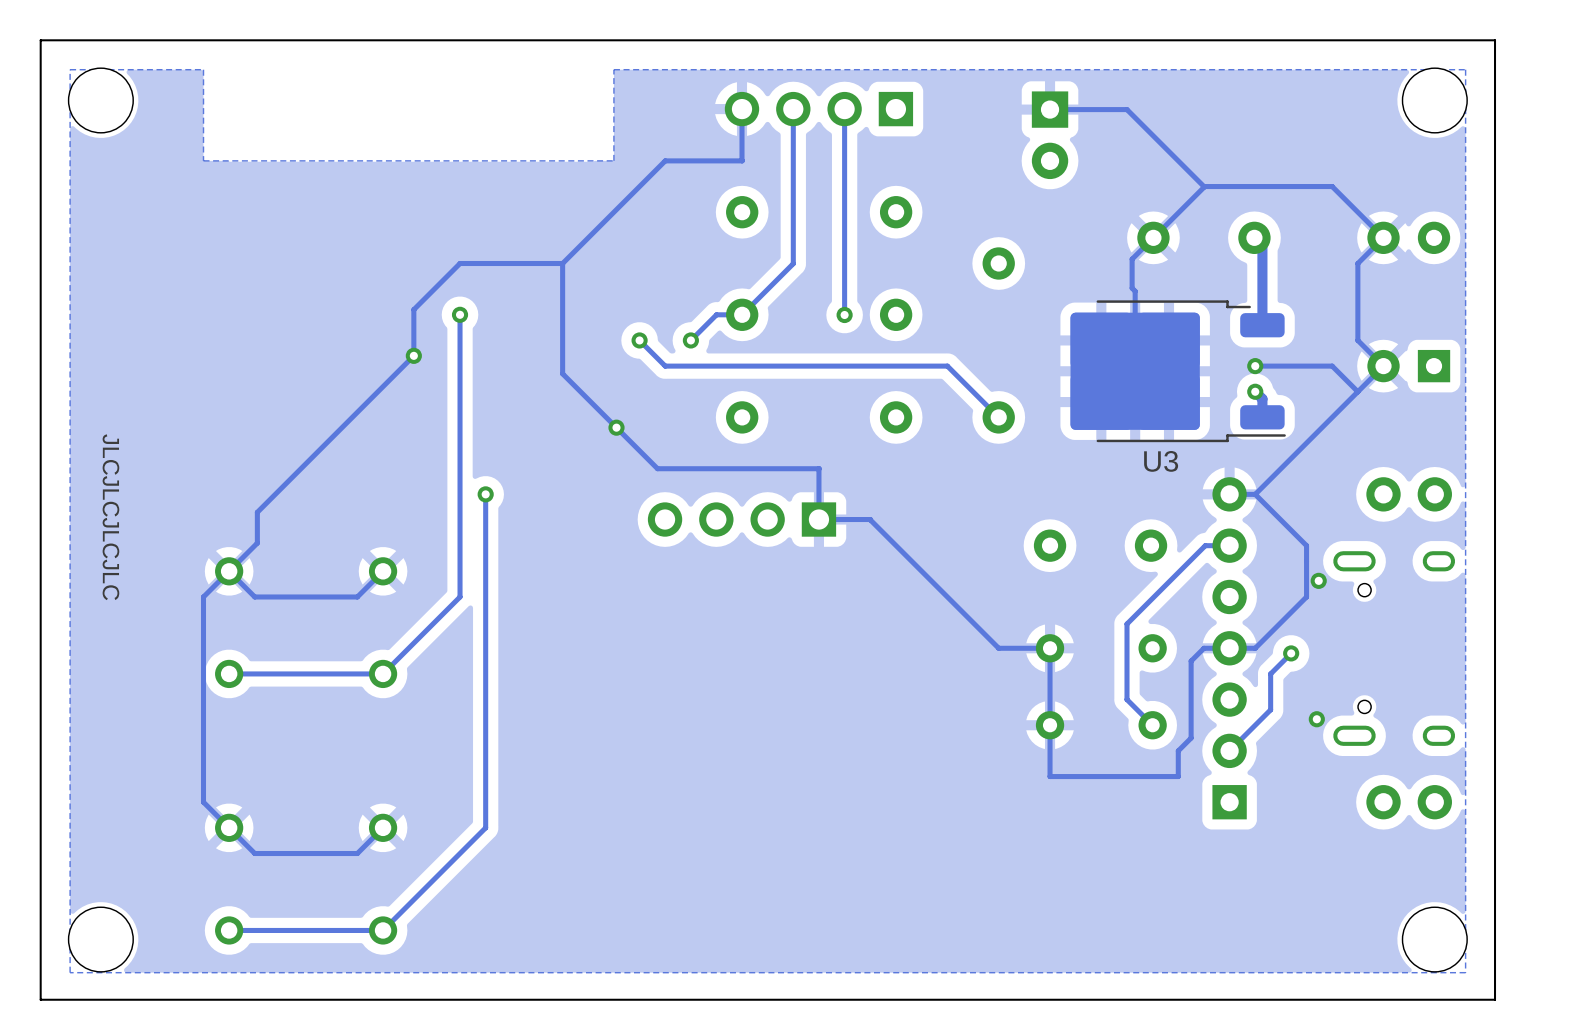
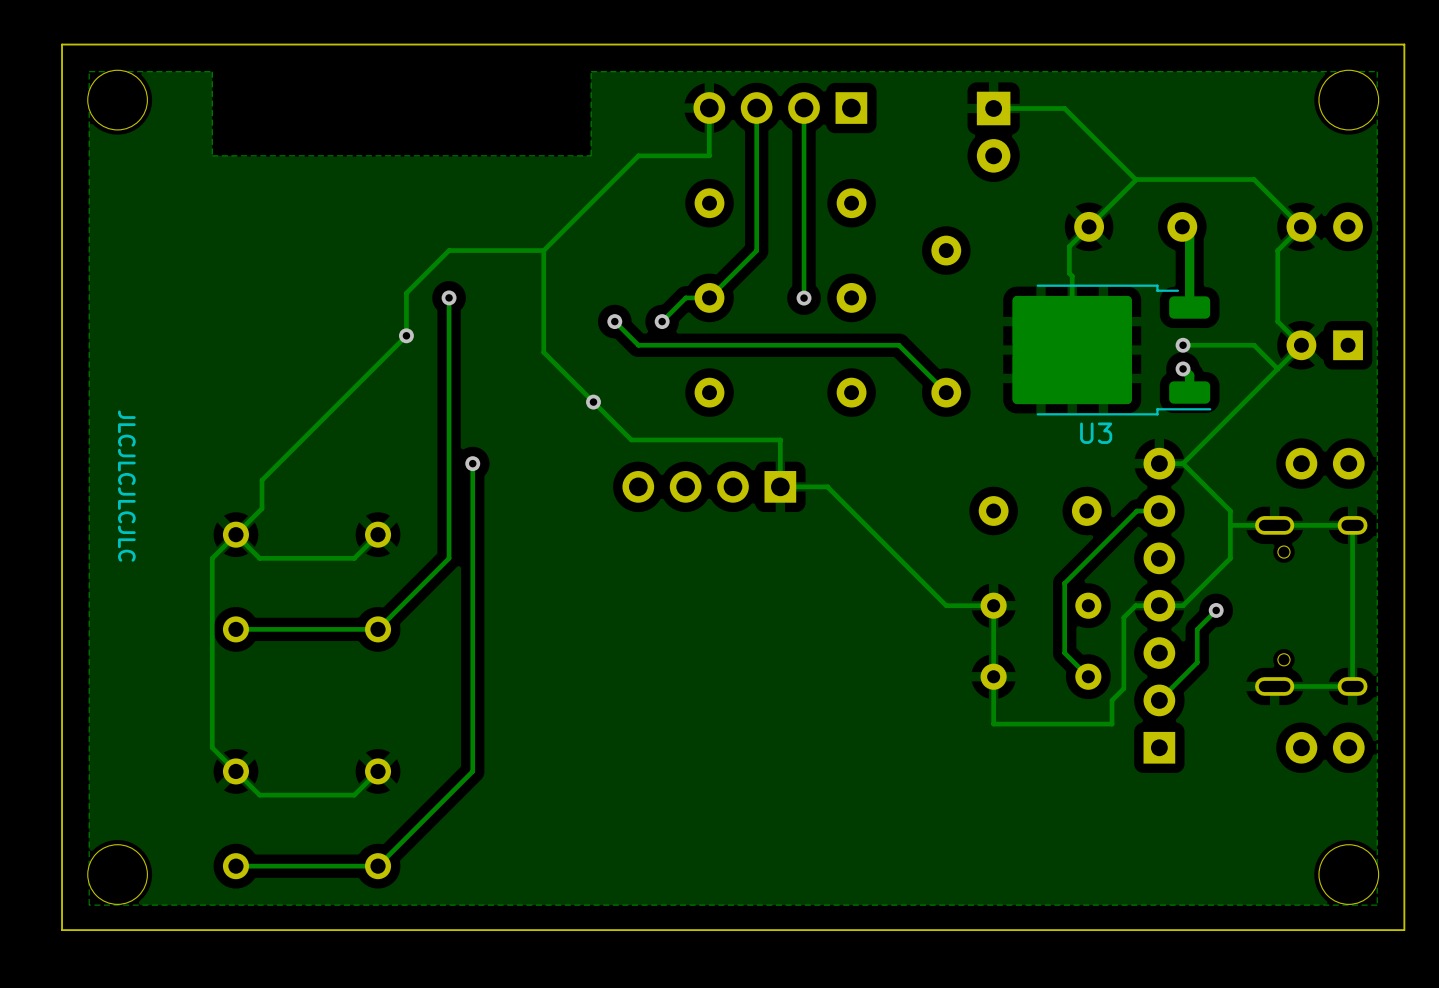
track: none -> (1352, 525) (1352, 686) (1274, 686)
track: none -> (1358, 525) (1230, 525)
via: (1318, 580) -> none
via: (1316, 719) -> none

